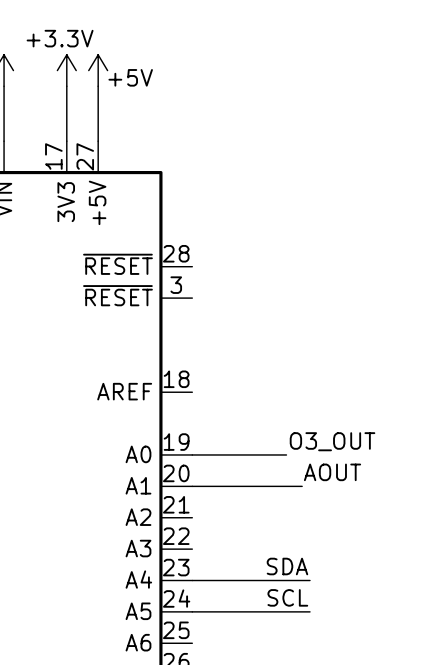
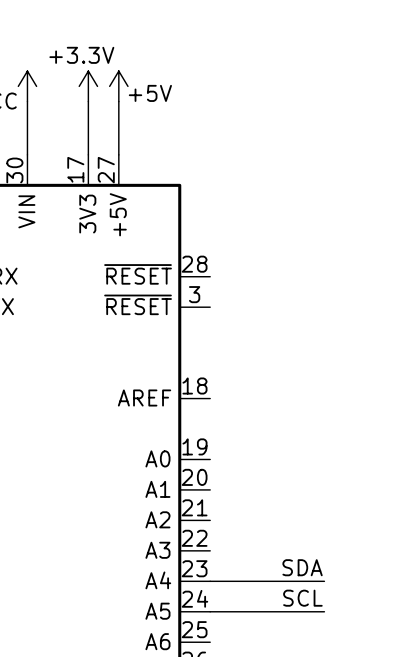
label: O3_OUT (332, 441) -> none
wire: (192, 454) (286, 454) -> none
label: AOUT (332, 472) -> none
wire: (192, 486) (302, 486) -> none

